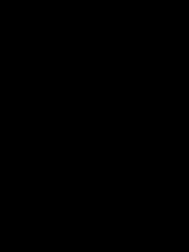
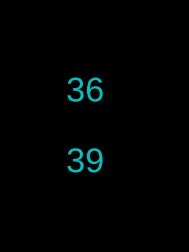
text: none -> 36 (85, 89)
text: none -> 39 (85, 160)

